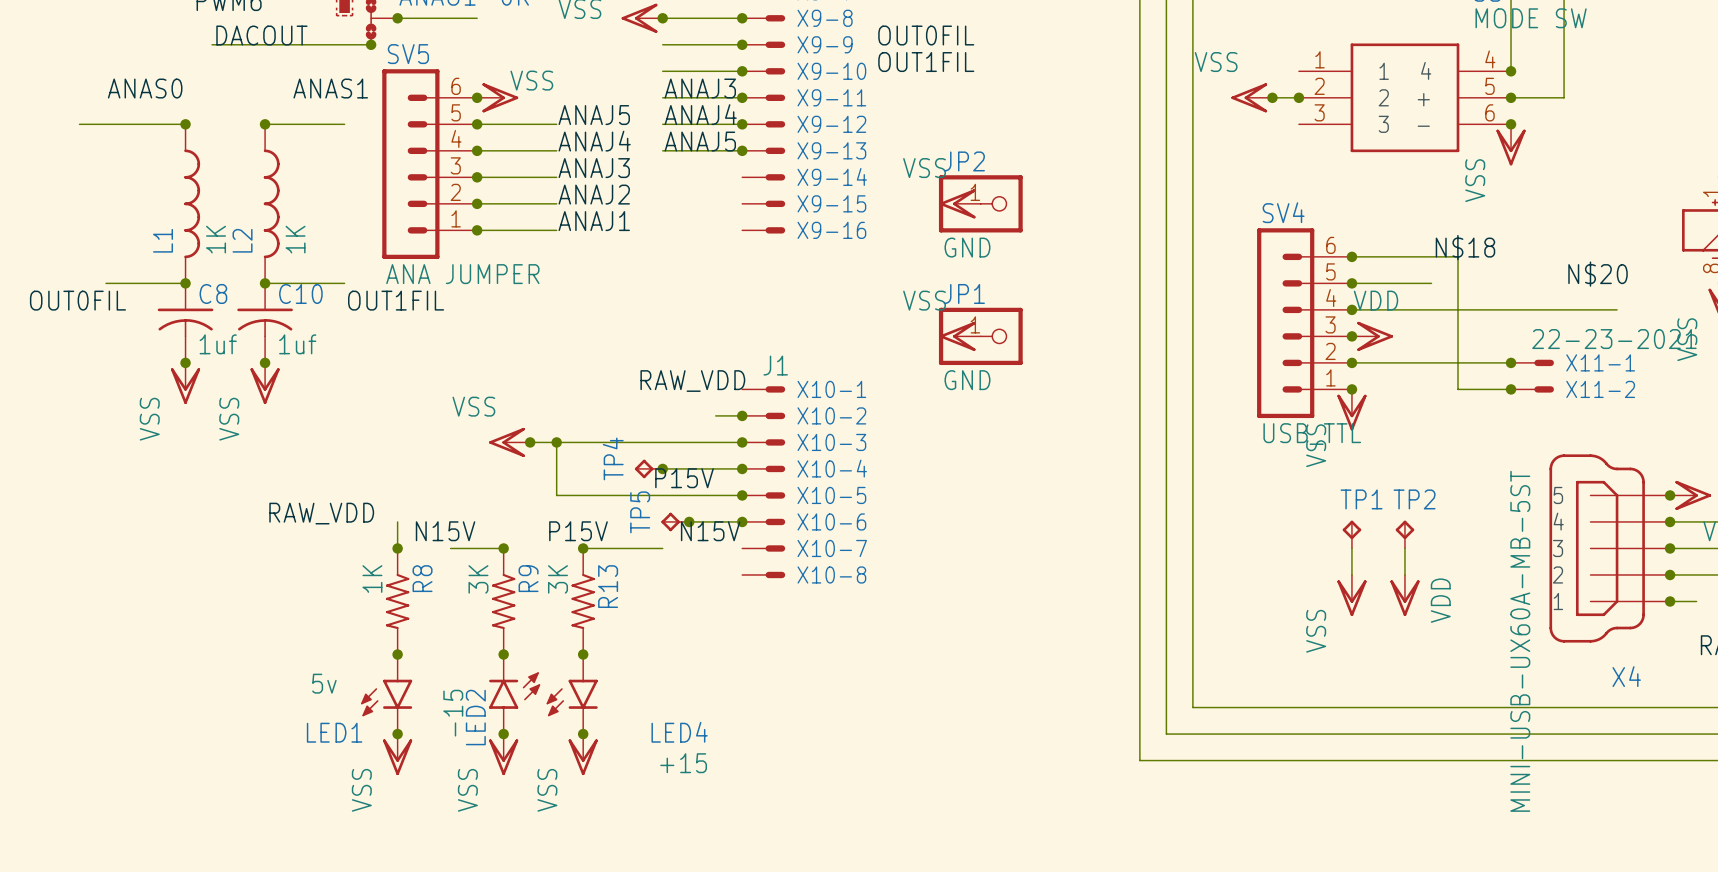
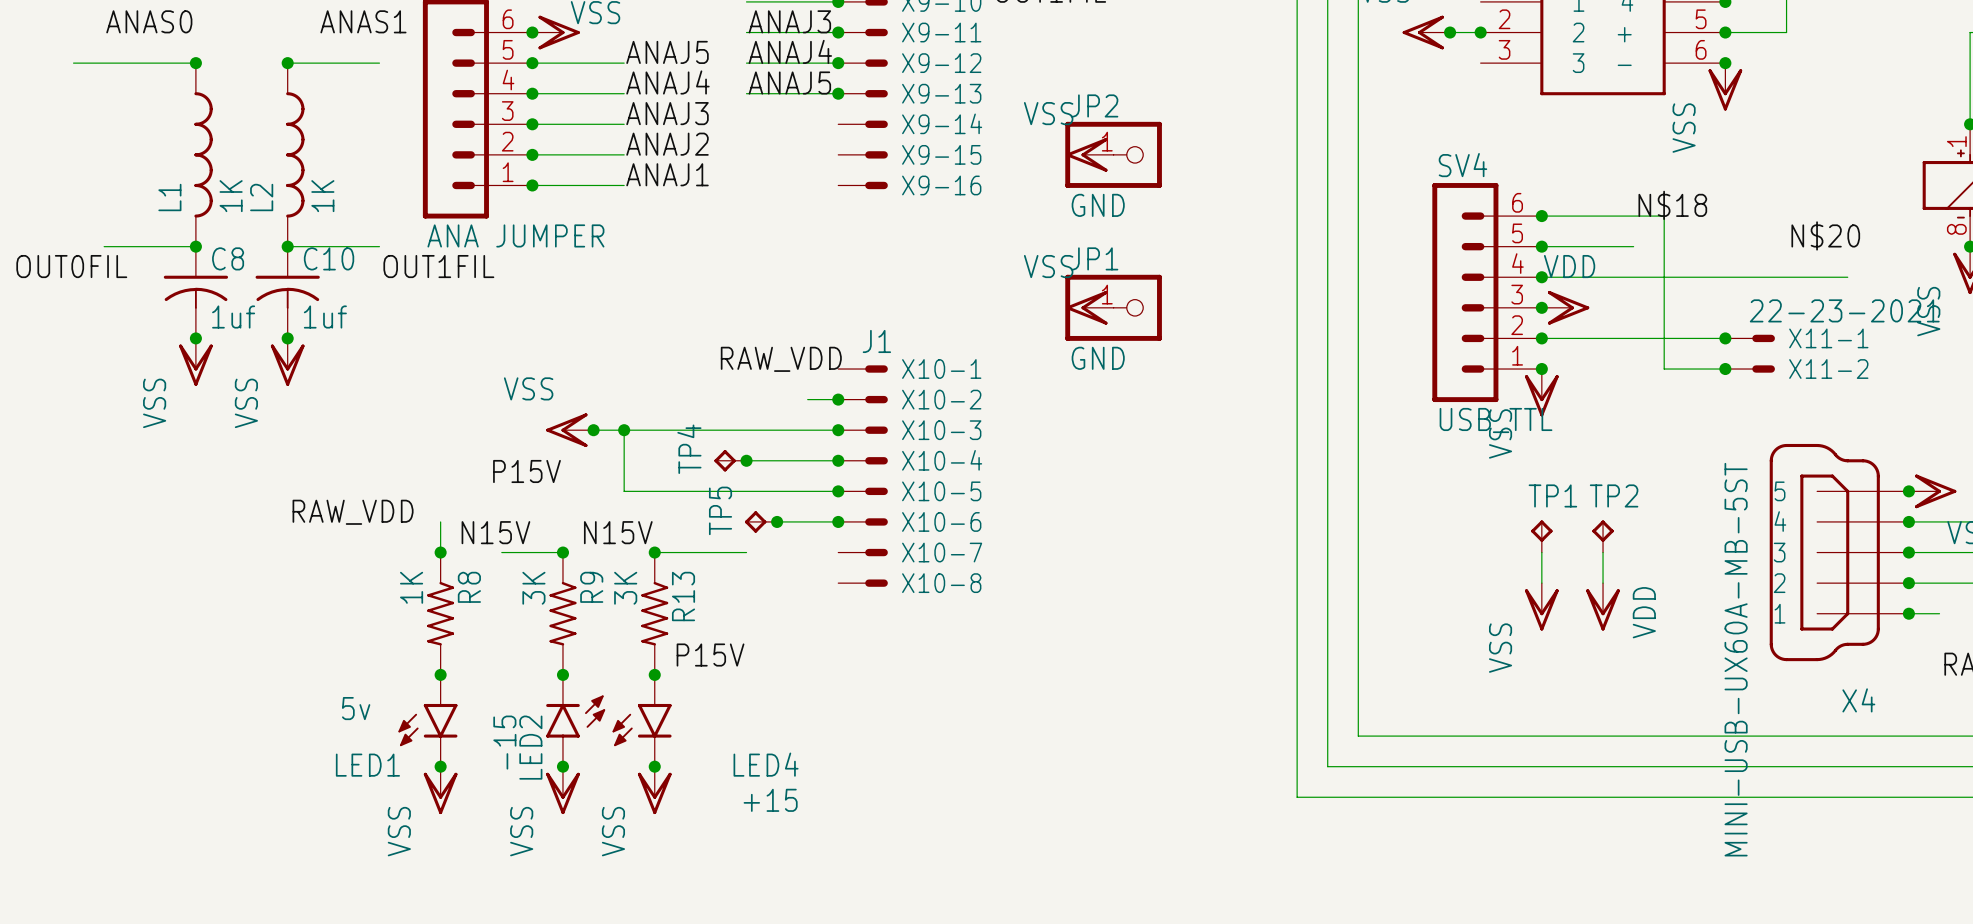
label: none -> P15V (526, 471)
label: P15V (684, 478) -> none
label: P15V (578, 531) -> none
label position: N15V (710, 531) -> N15V (618, 532)
label: none -> P15V (710, 655)

